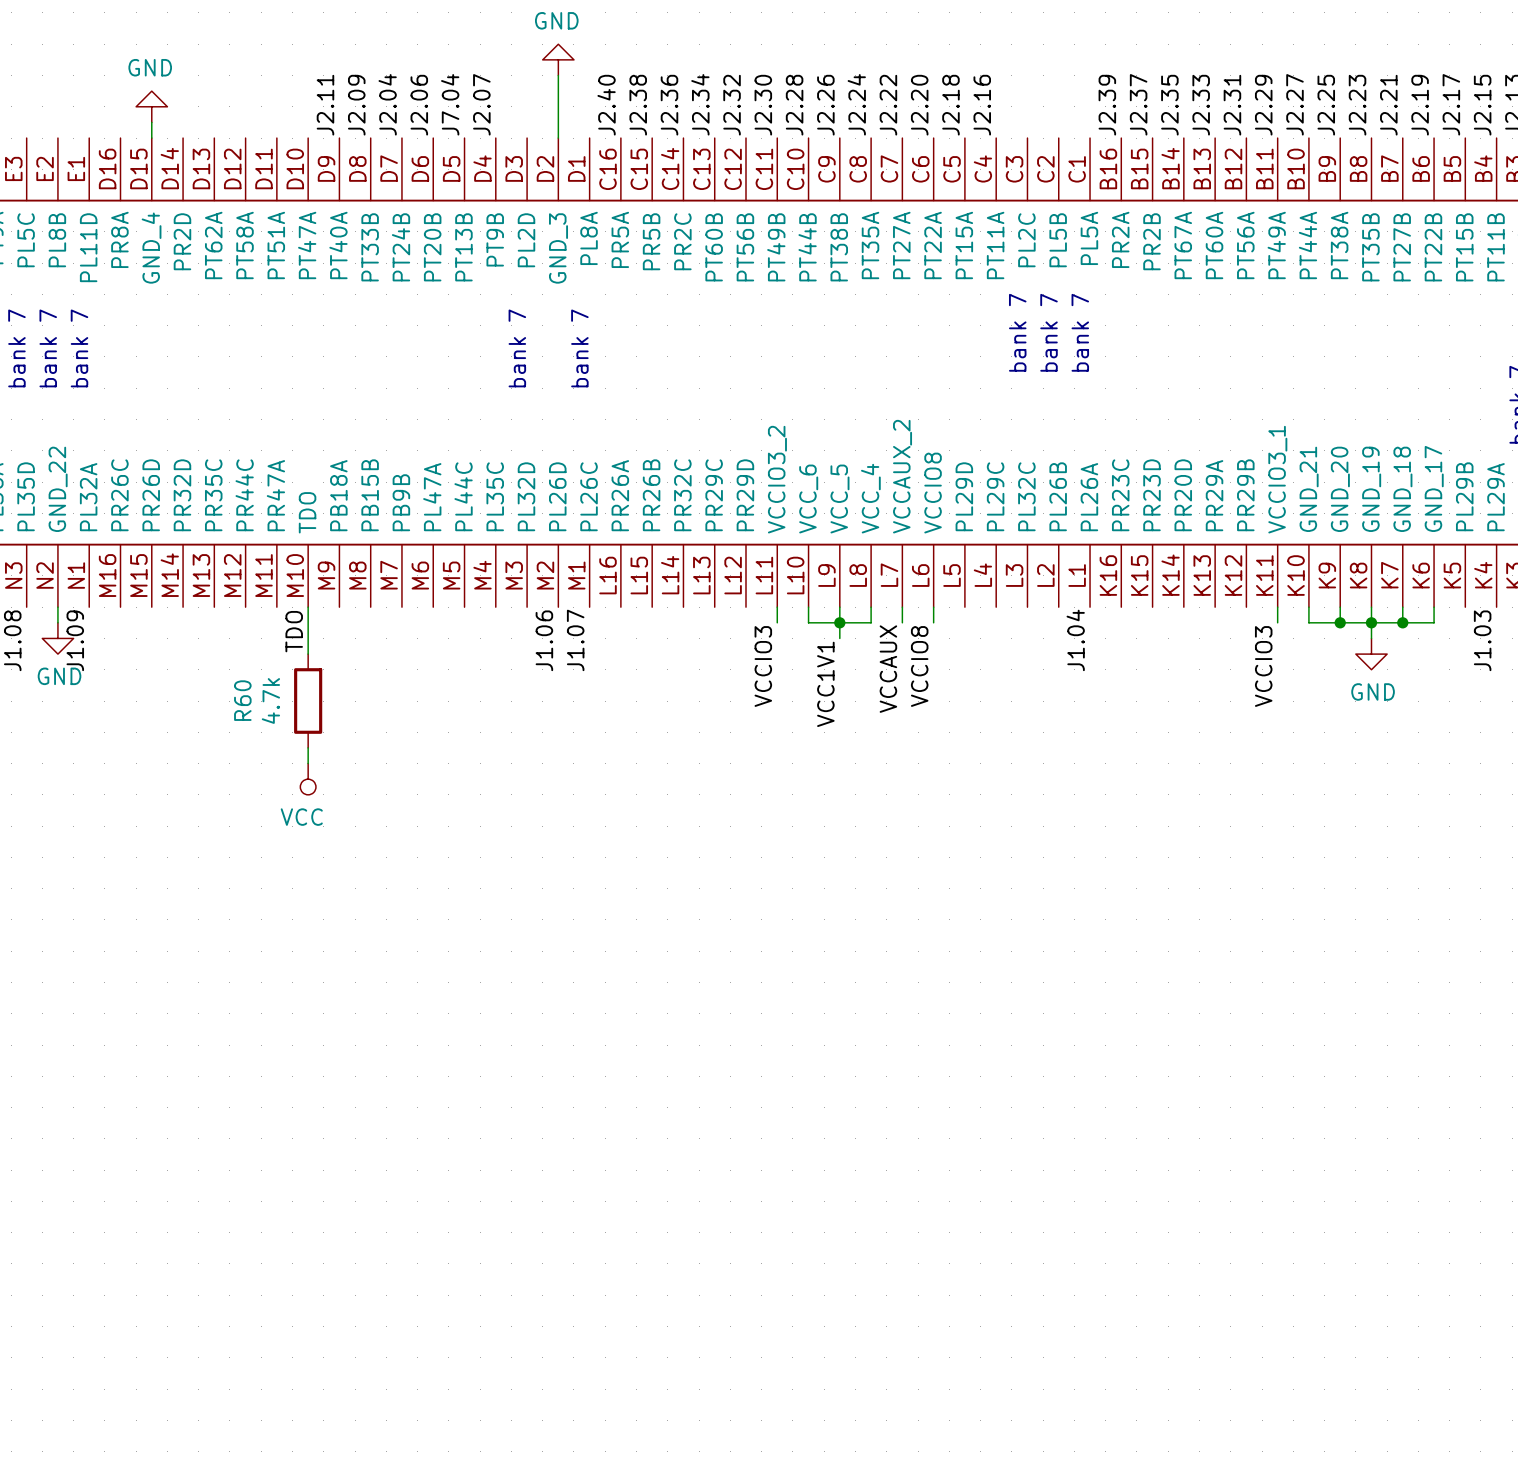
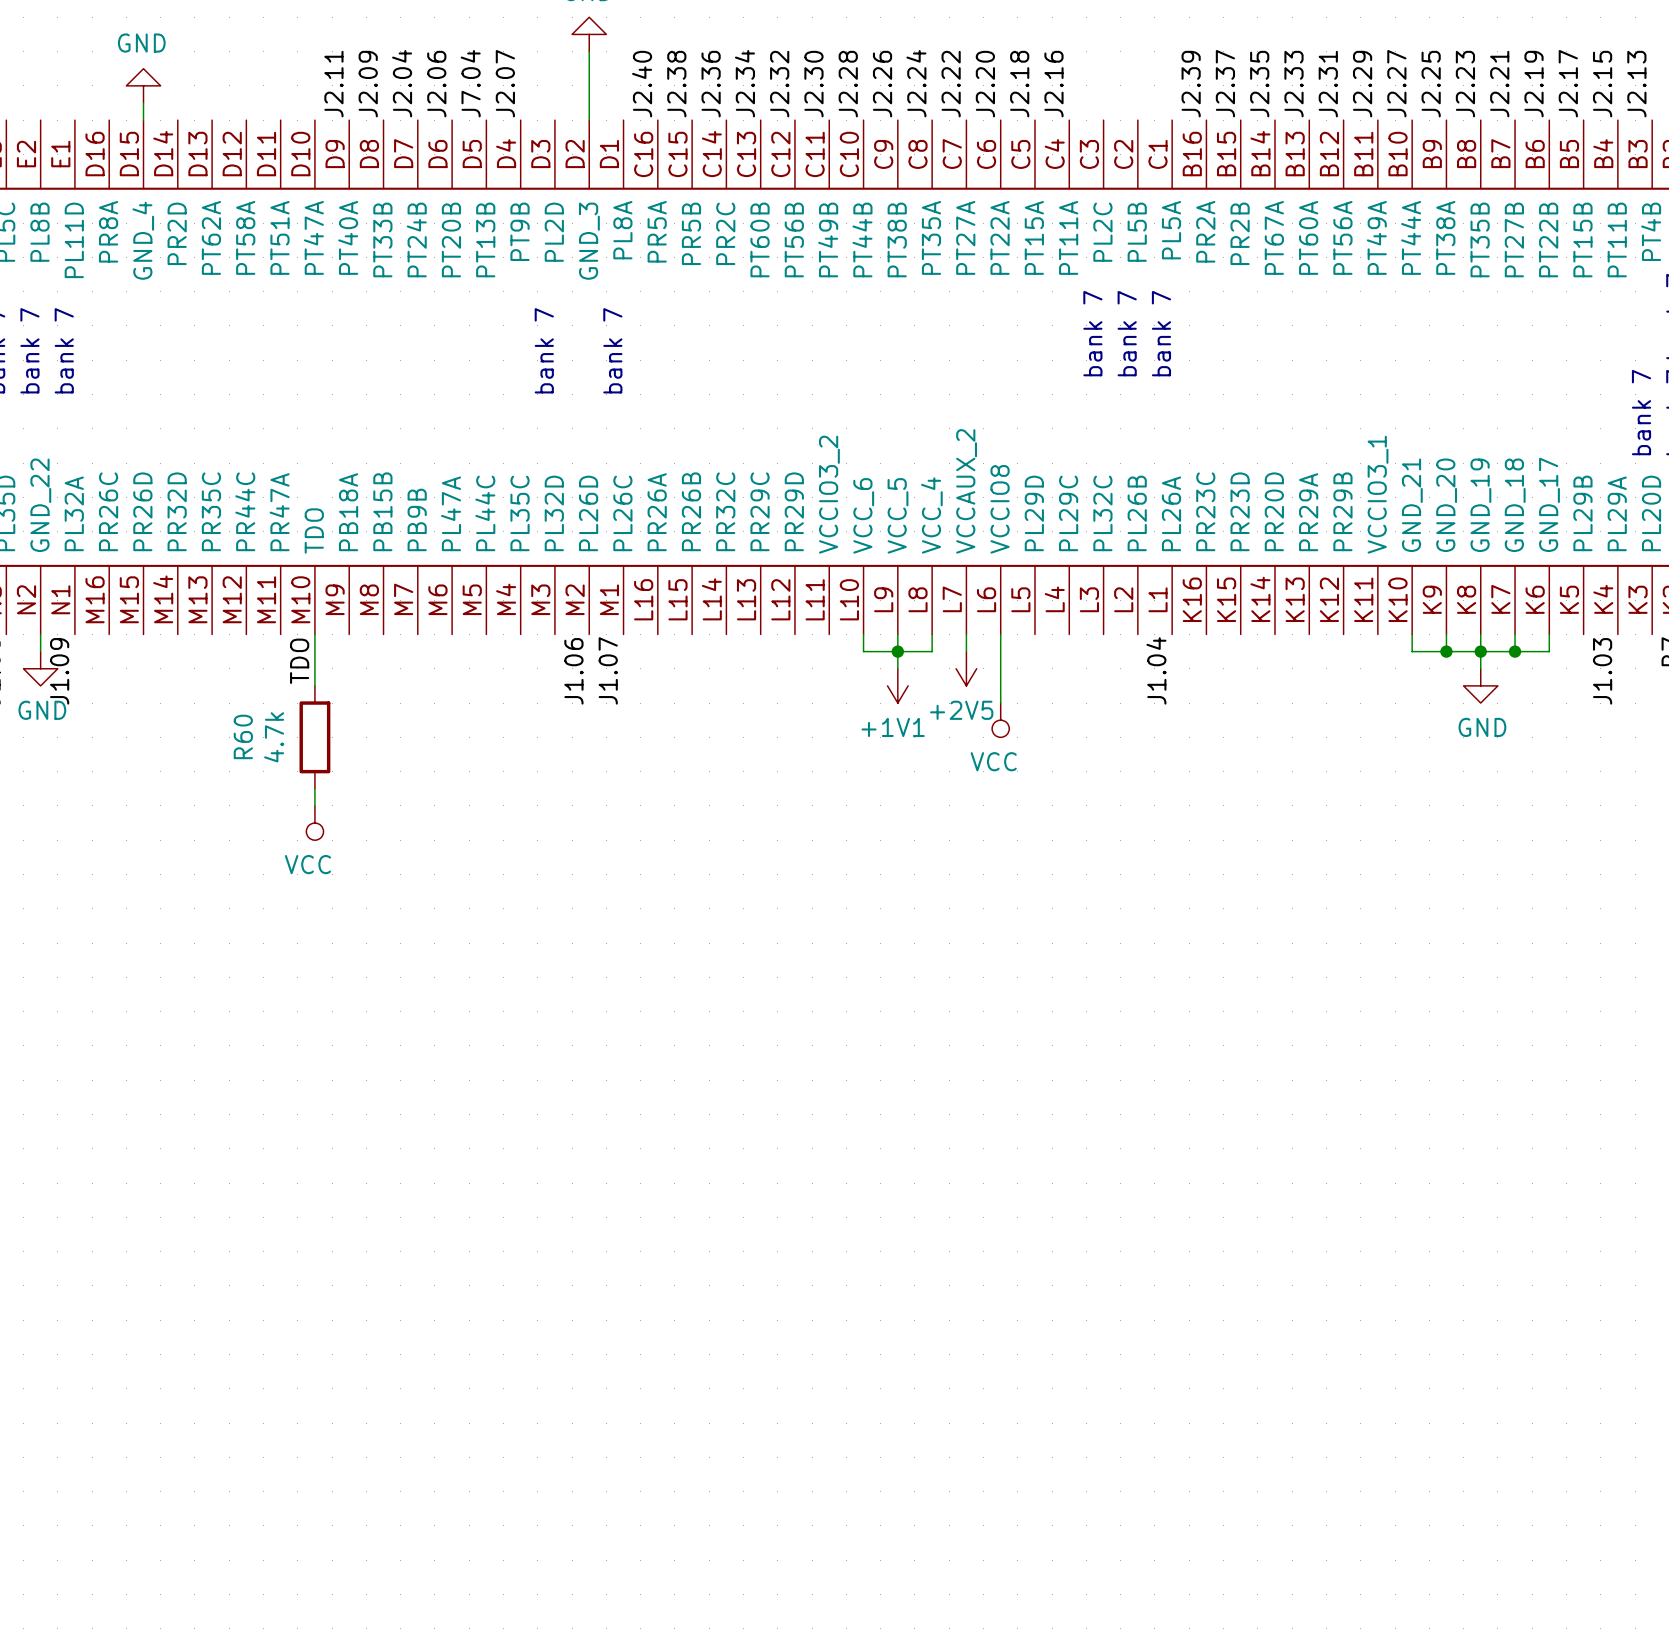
wire: (777, 607) (777, 622) -> none
wire: (1277, 607) (1277, 622) -> none
wire: none -> (1000, 651) (1000, 703)
power symbol: none -> +2V5 (966, 668)
power symbol: none -> +1V1 (897, 685)
label: VCCIO3 (763, 666) -> none
label: VCCIO8 (919, 666) -> none
label: VCCIO3 (1263, 666) -> none
label: VCCAUX (888, 669) -> none
label: VCC1V1 (825, 684) -> none
power symbol: none -> VCC (1000, 720)

